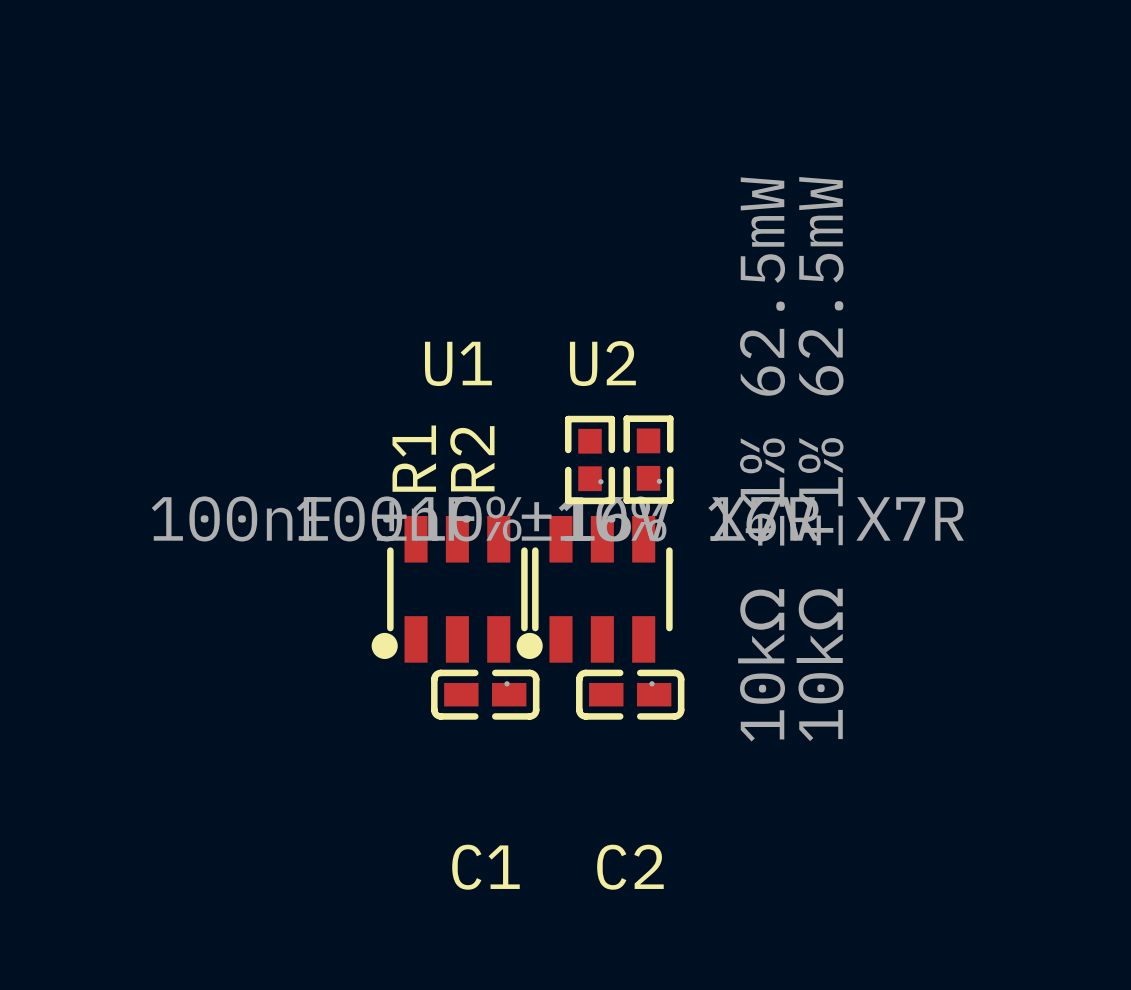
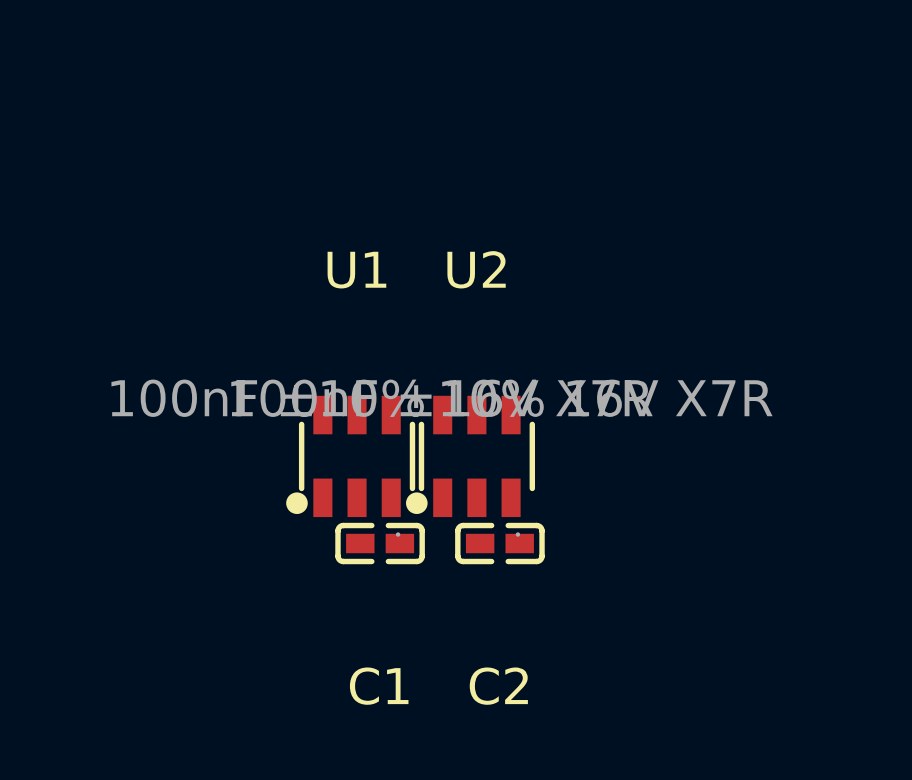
R1: 10kΩ ±1% 62.5mW (590, 459) -> none
R2: 10kΩ ±1% 62.5mW (648, 459) -> none

